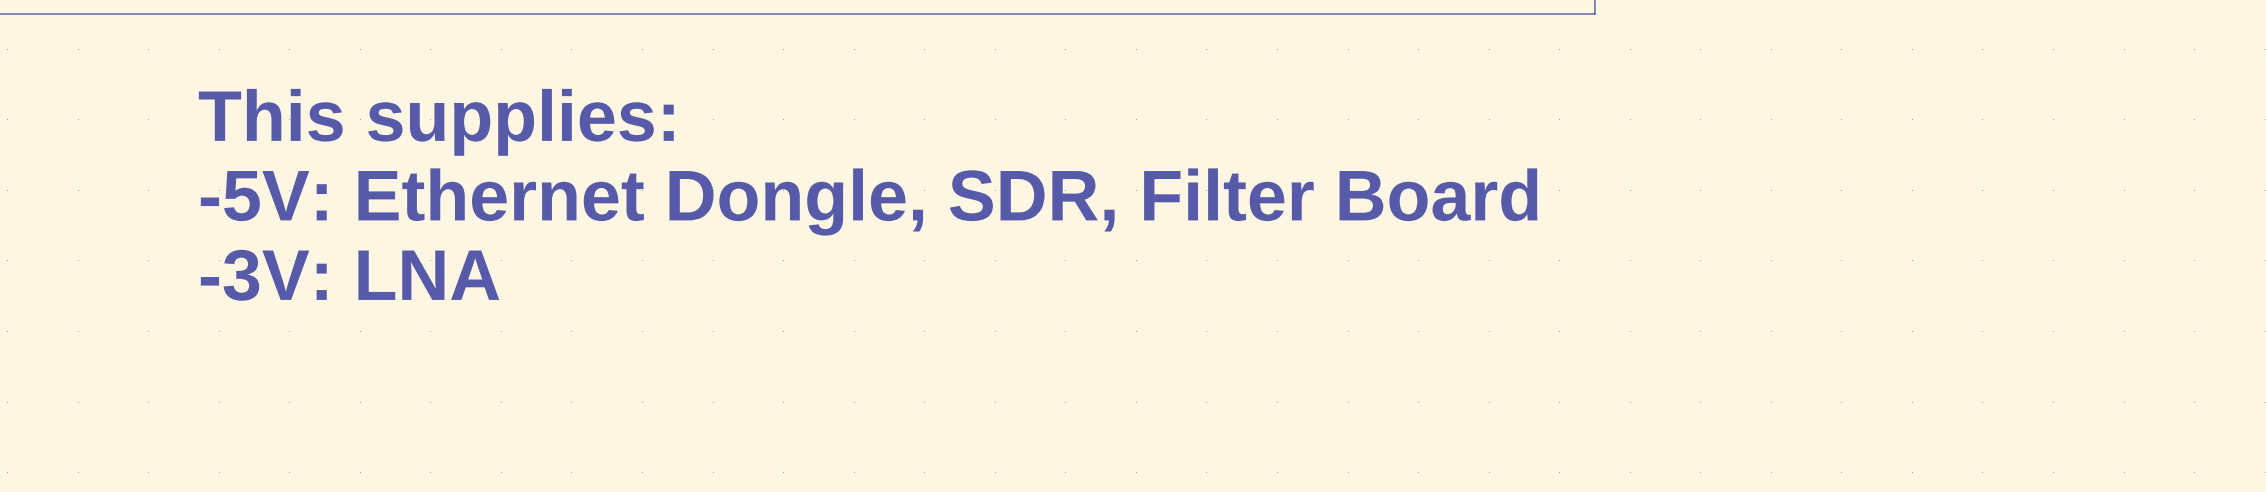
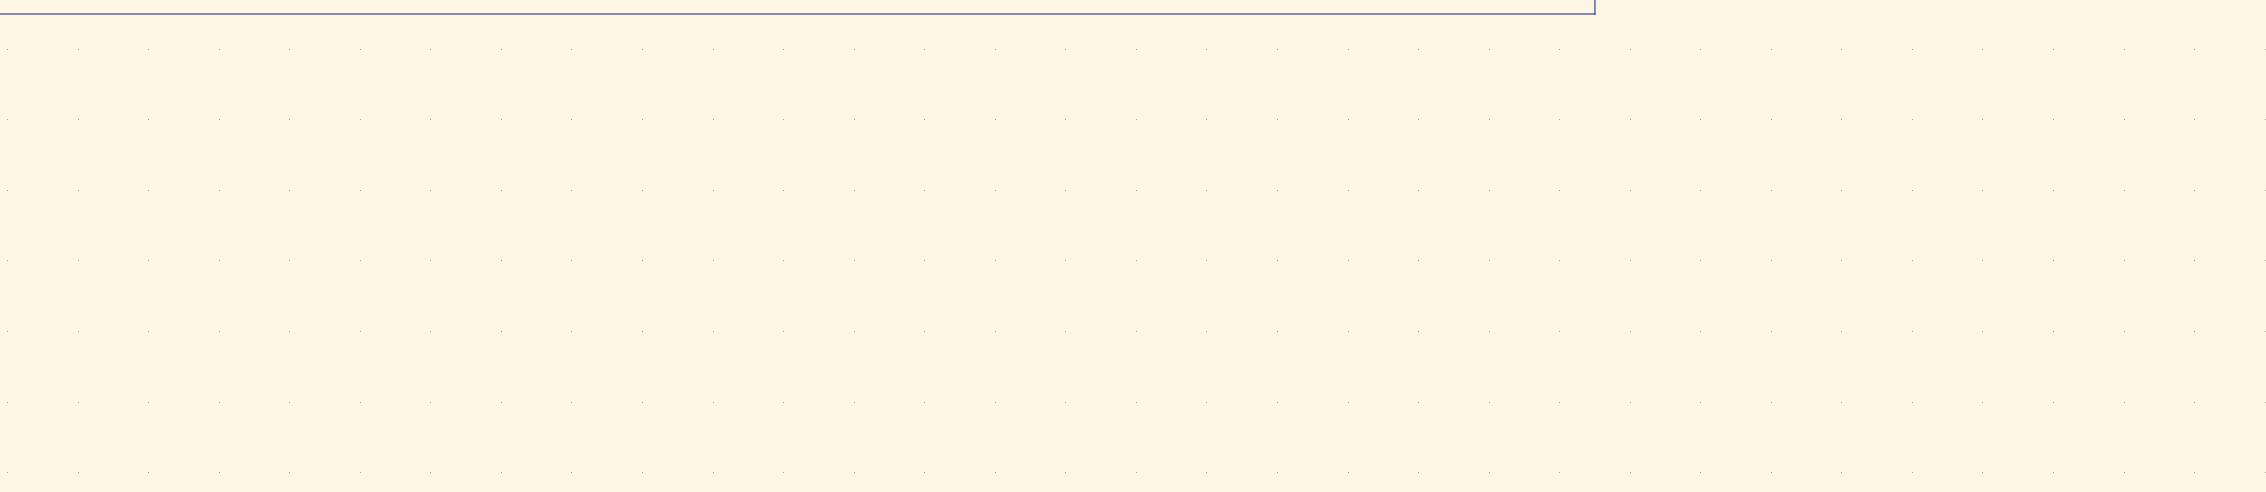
text: This supplies: (436, 122) -> none
text: -5V: Ethernet Dongle, SDR, Filter Board (869, 202) -> none
text: -3V: LNA (350, 275) -> none

